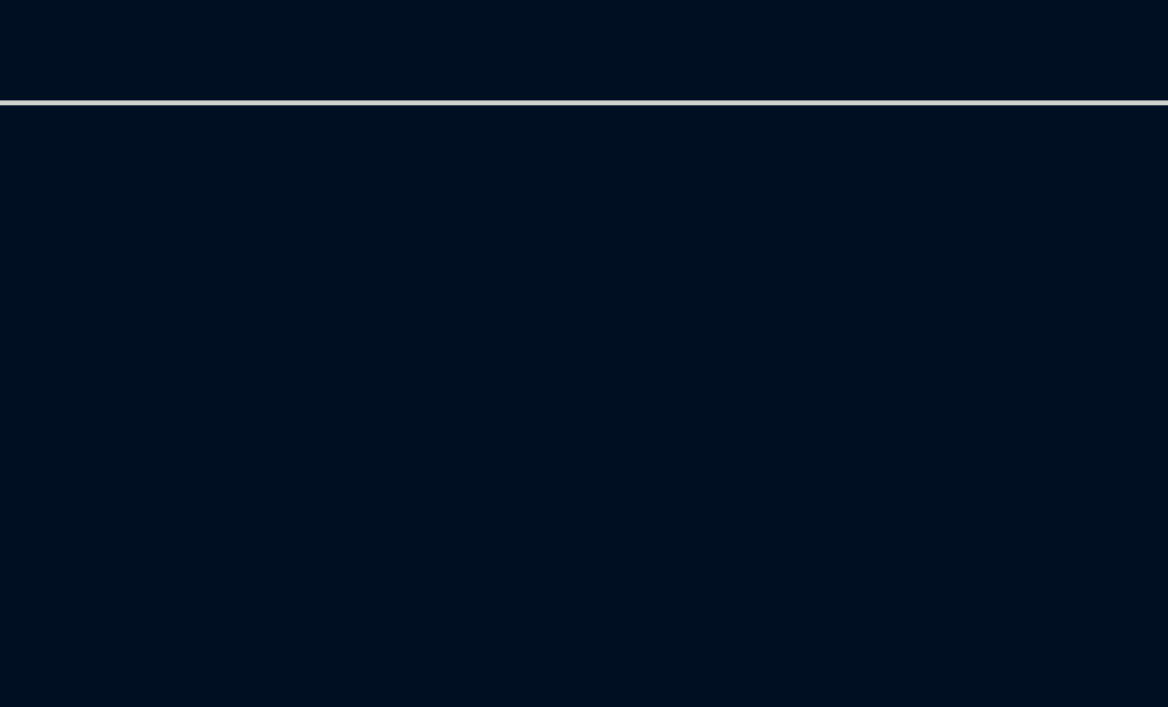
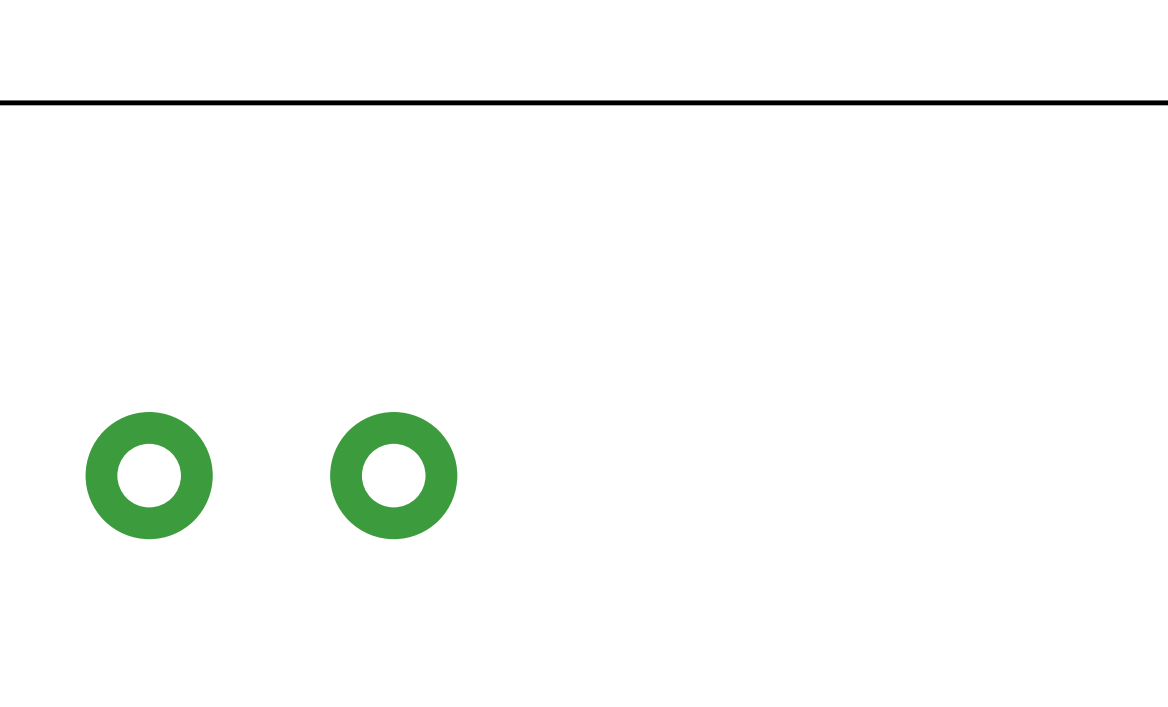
part: none -> (271, 475)

